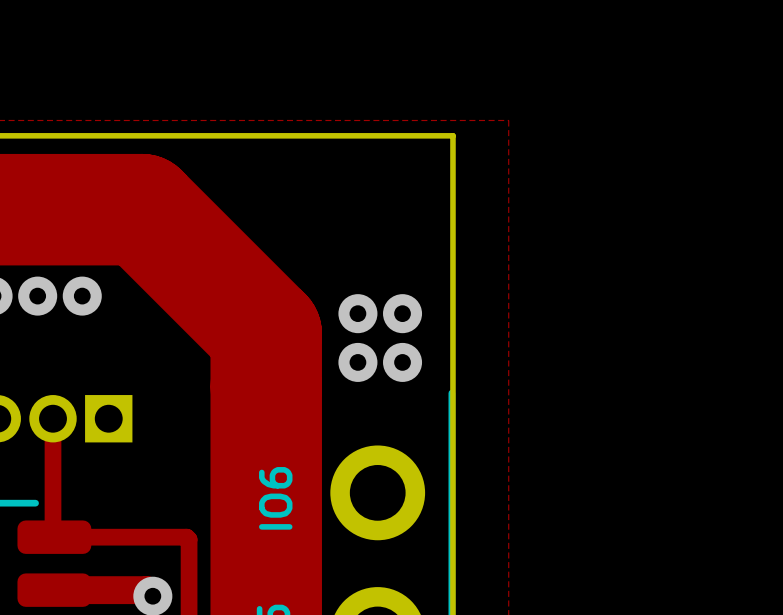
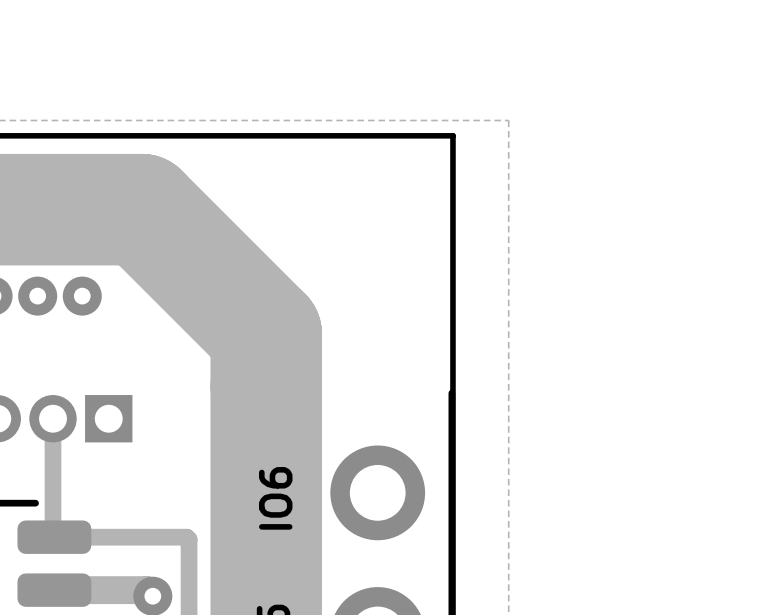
via: (357, 313) -> none
via: (402, 313) -> none
via: (357, 362) -> none
via: (402, 362) -> none

